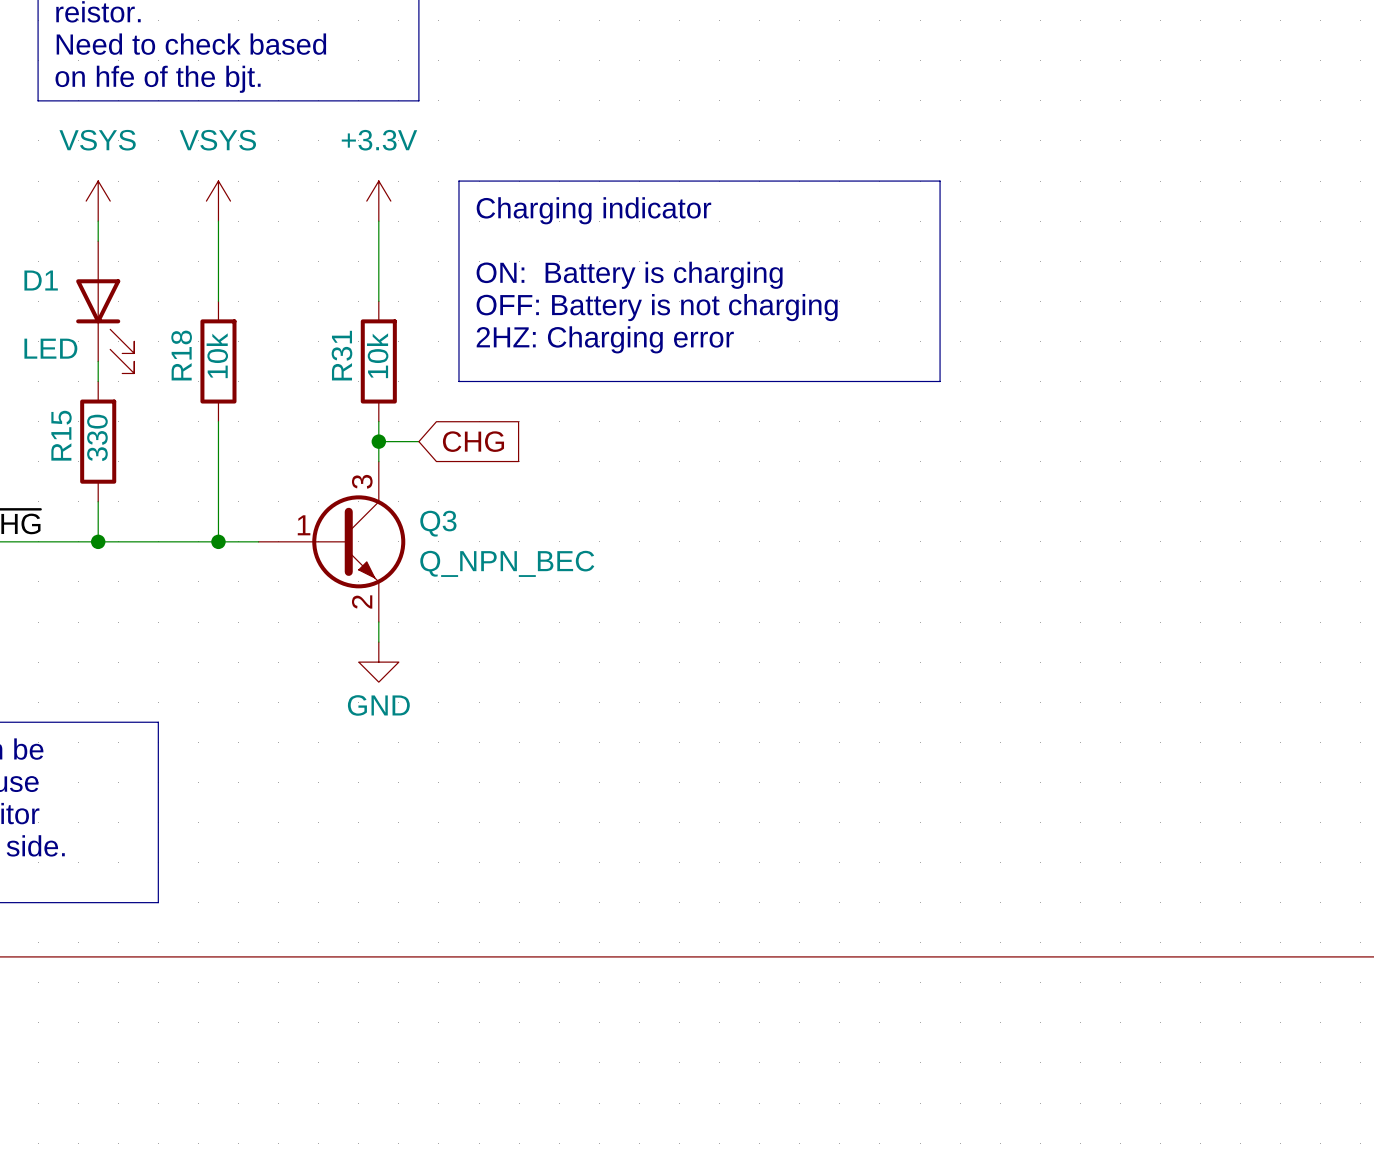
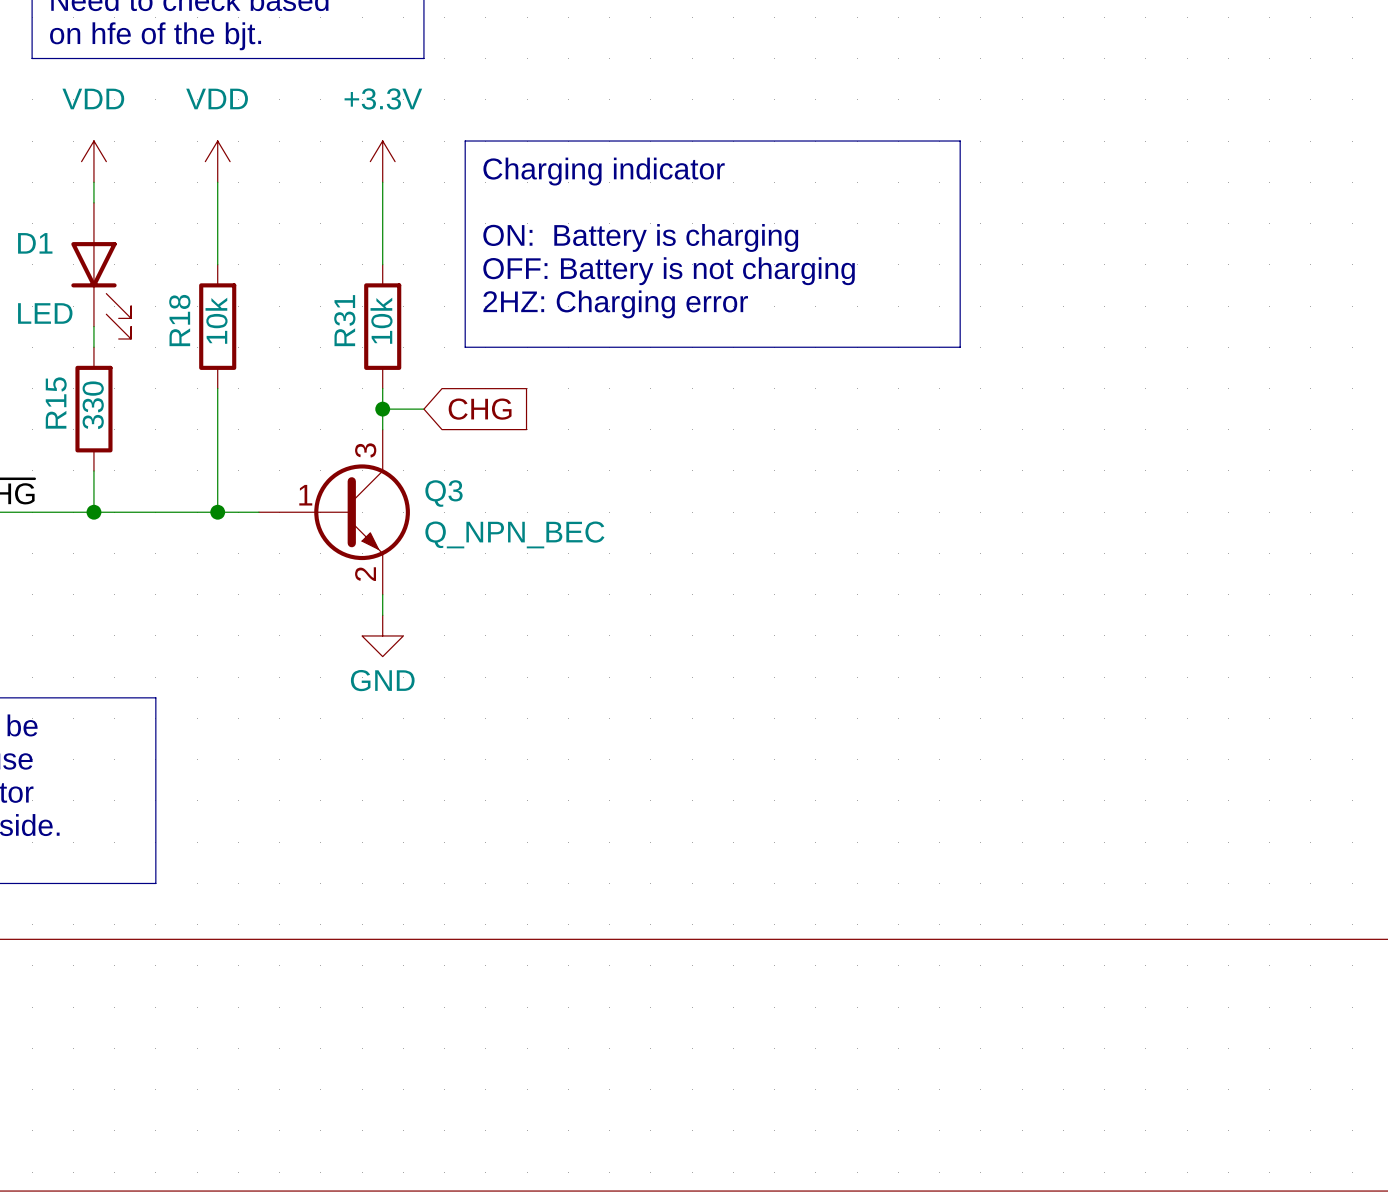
power symbol: VSYS (98, 201) -> VDD (93, 161)
power symbol: VSYS (218, 201) -> VDD (217, 161)

